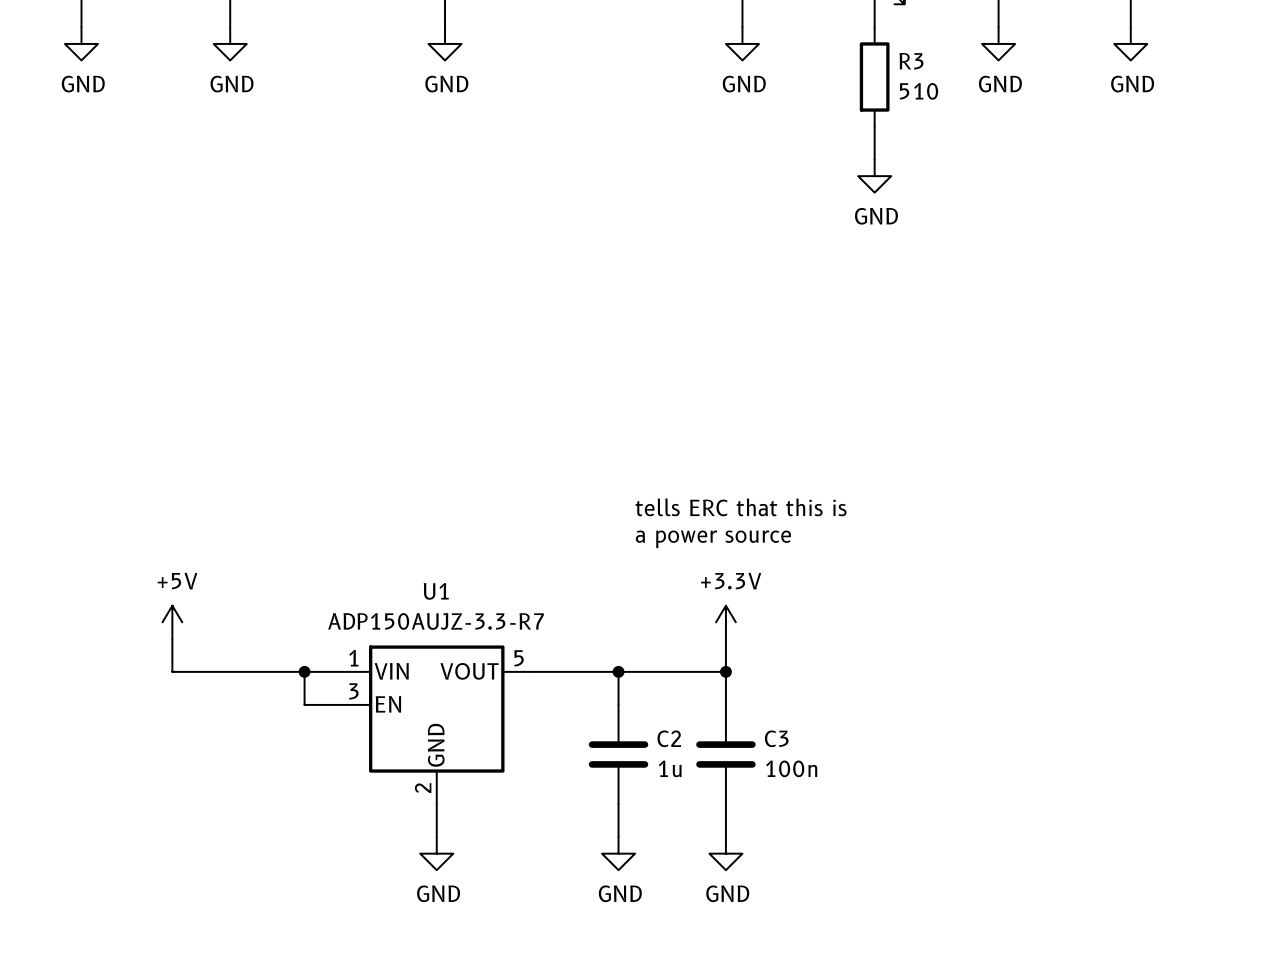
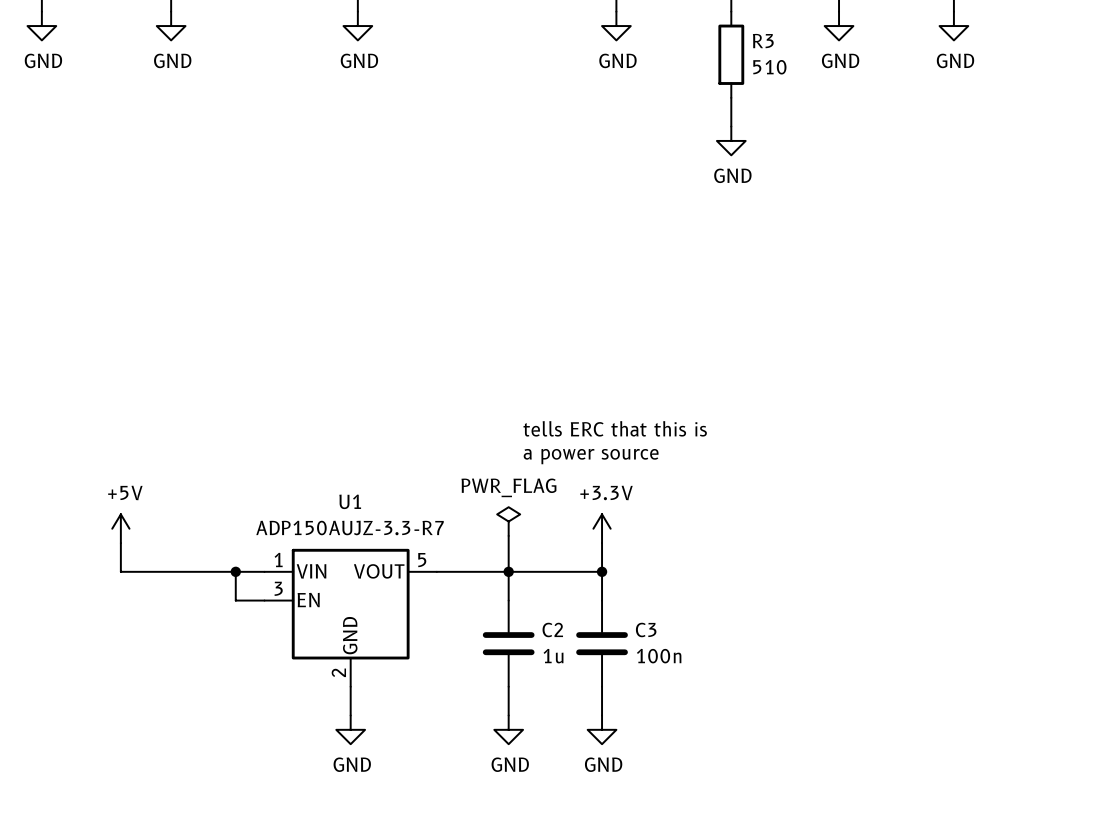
power symbol: none -> PWR_FLAG (508, 521)
wire: none -> (508, 535) (508, 571)

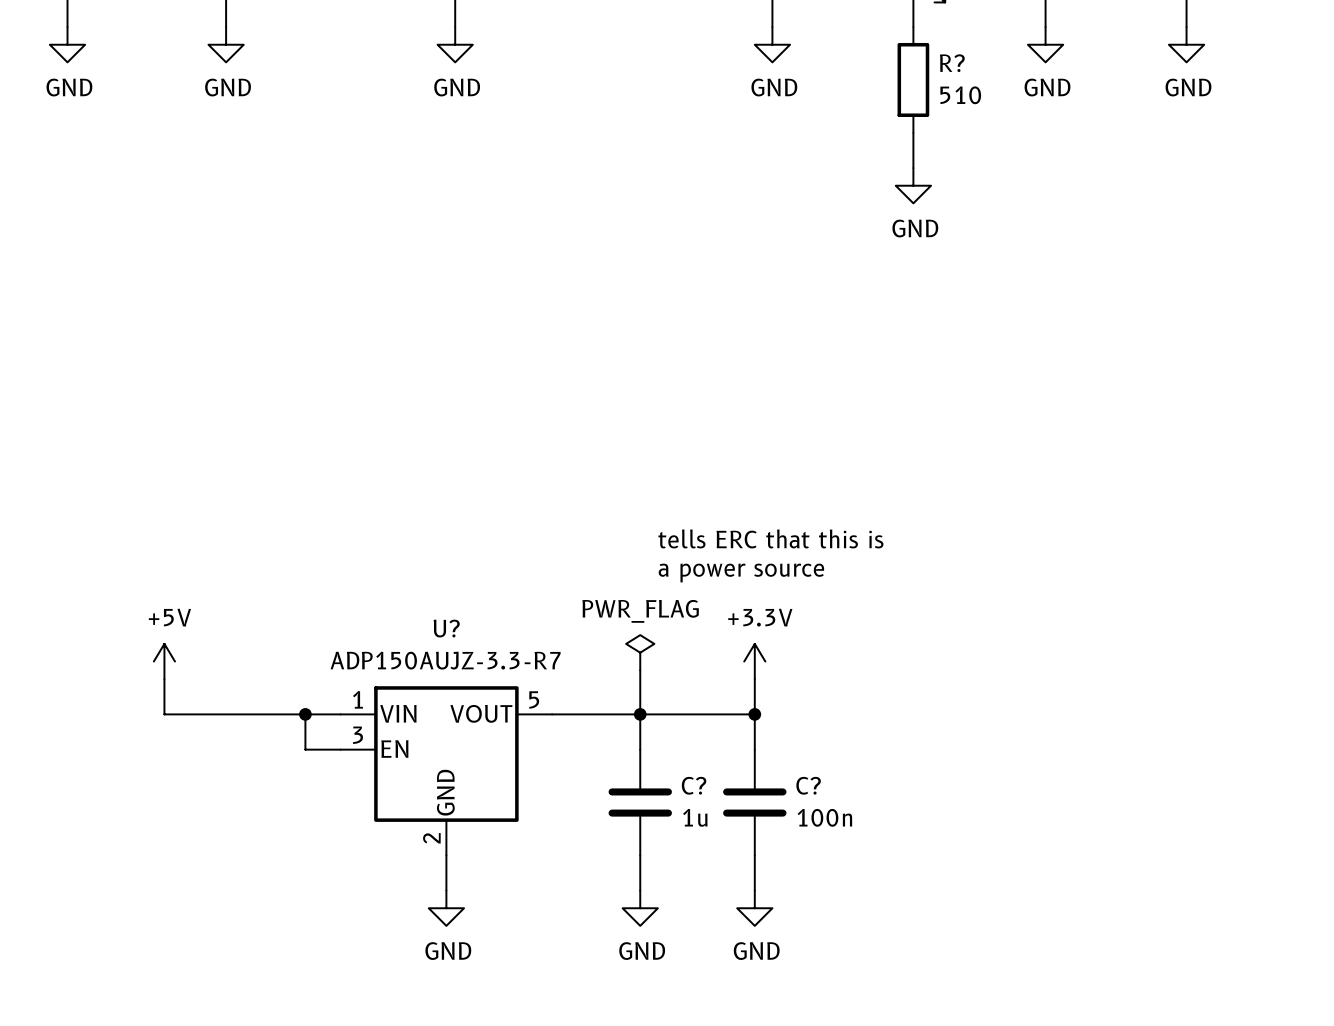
R3 name: R3 (763, 41) -> R? (952, 63)
U1 name: U1 (350, 501) -> U? (446, 628)
C2 name: C2 (552, 629) -> C? (694, 785)
C3 name: C3 (646, 629) -> C? (808, 785)

